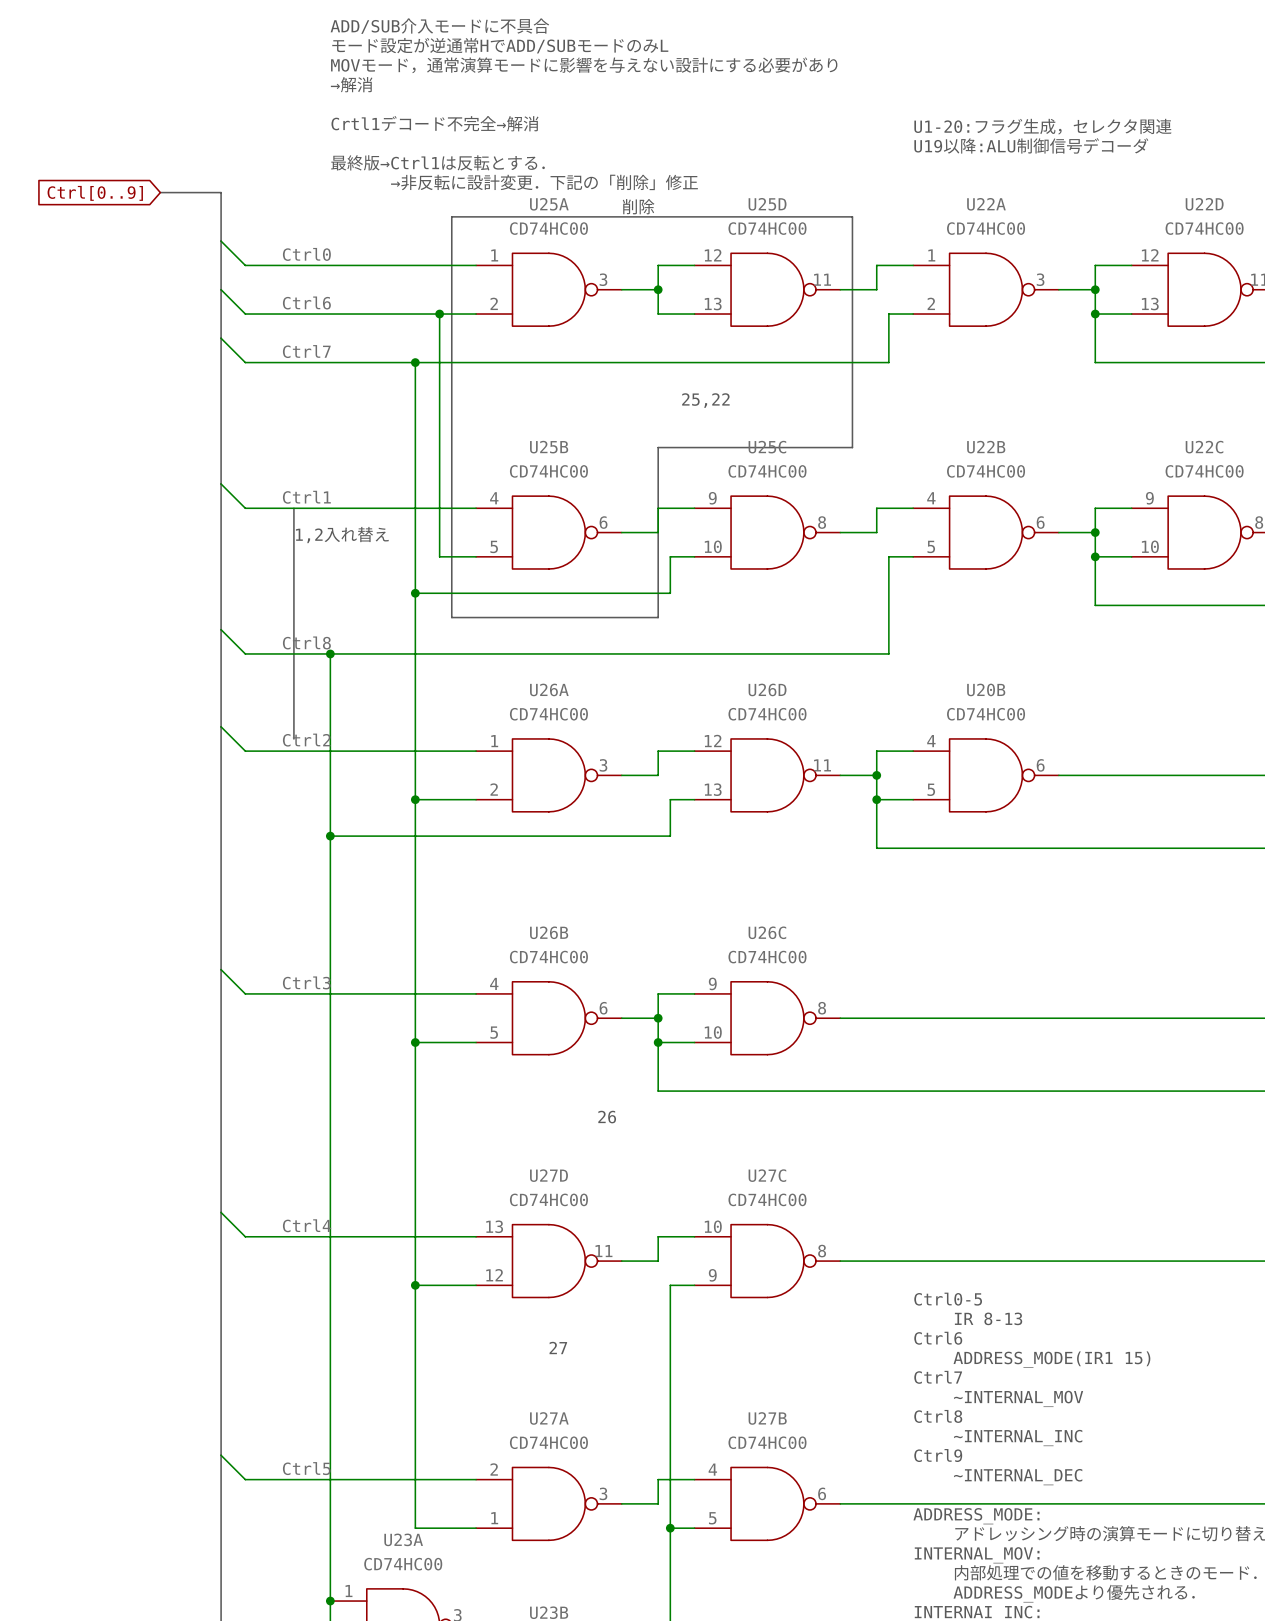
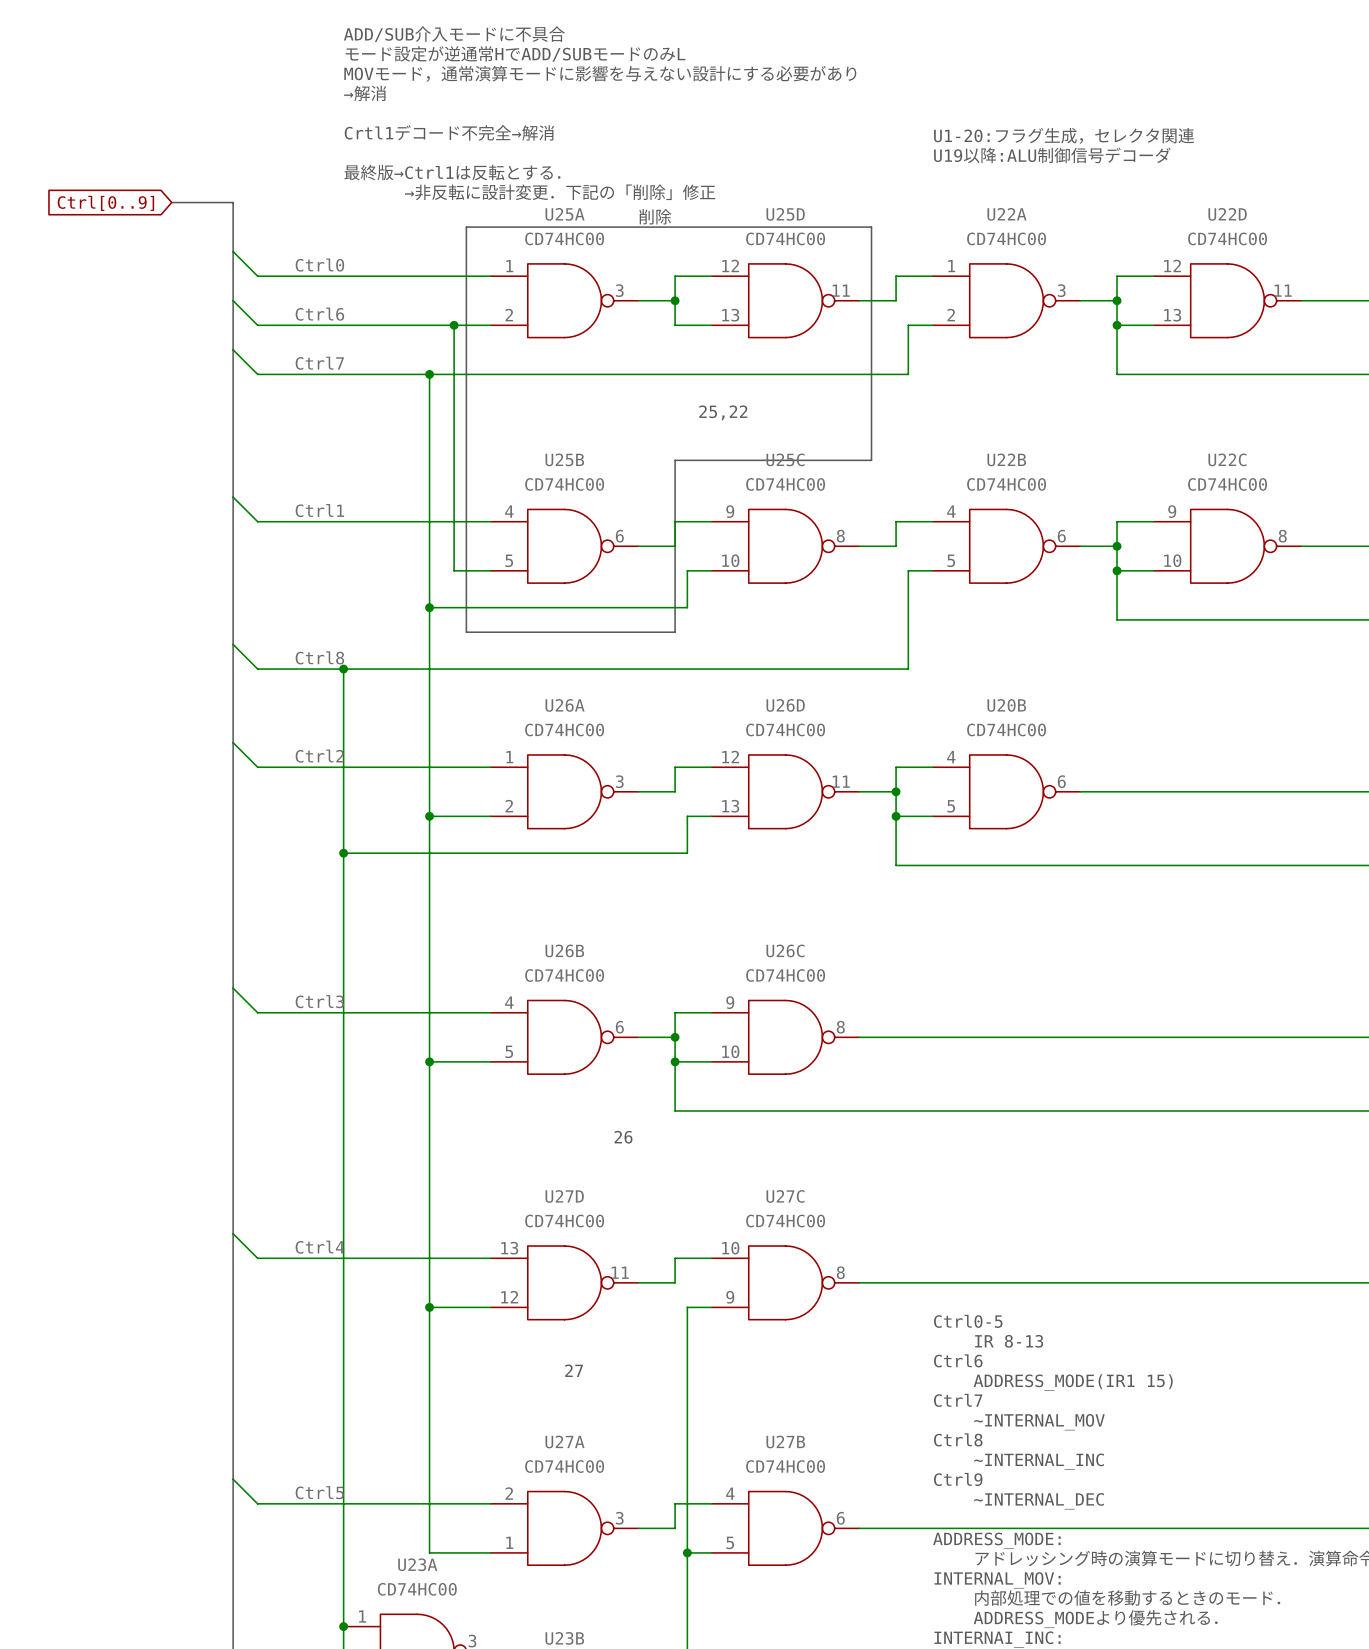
line: (293, 508) (293, 738) -> none
text: 1,2入れ替え (342, 535) -> none

